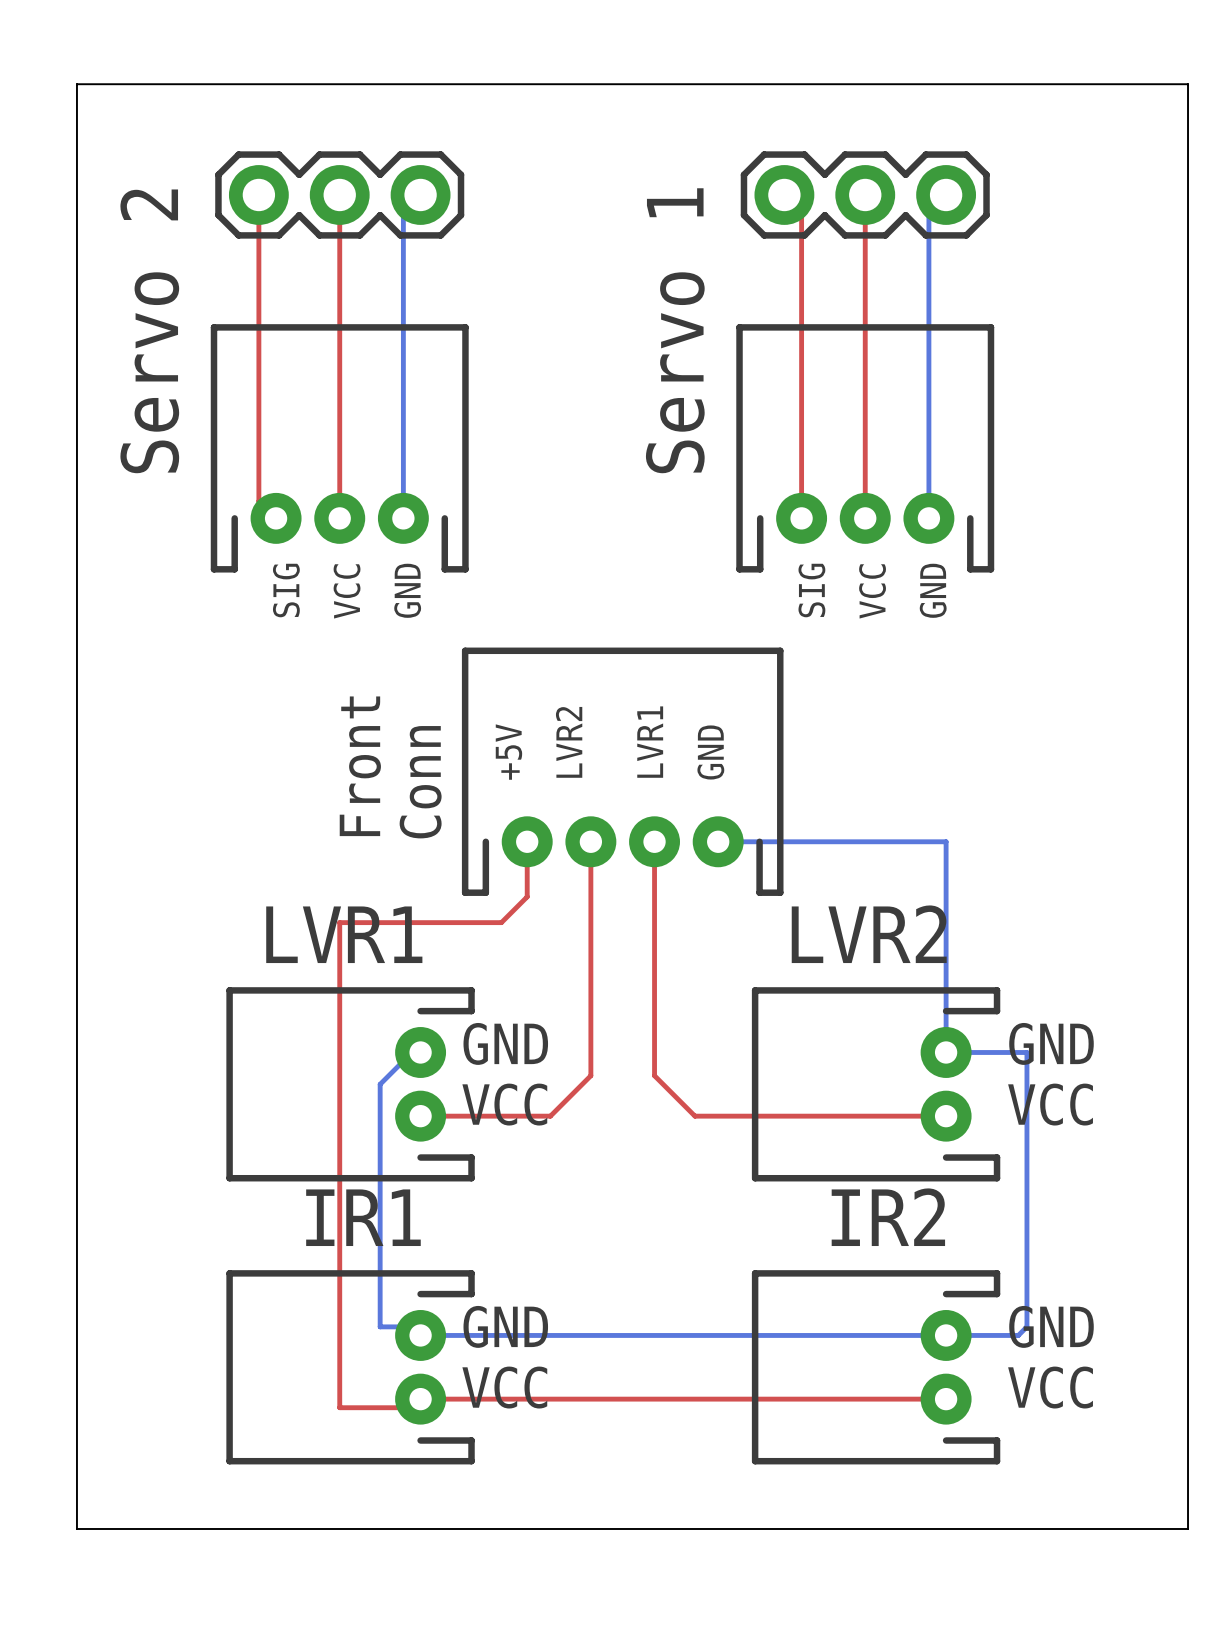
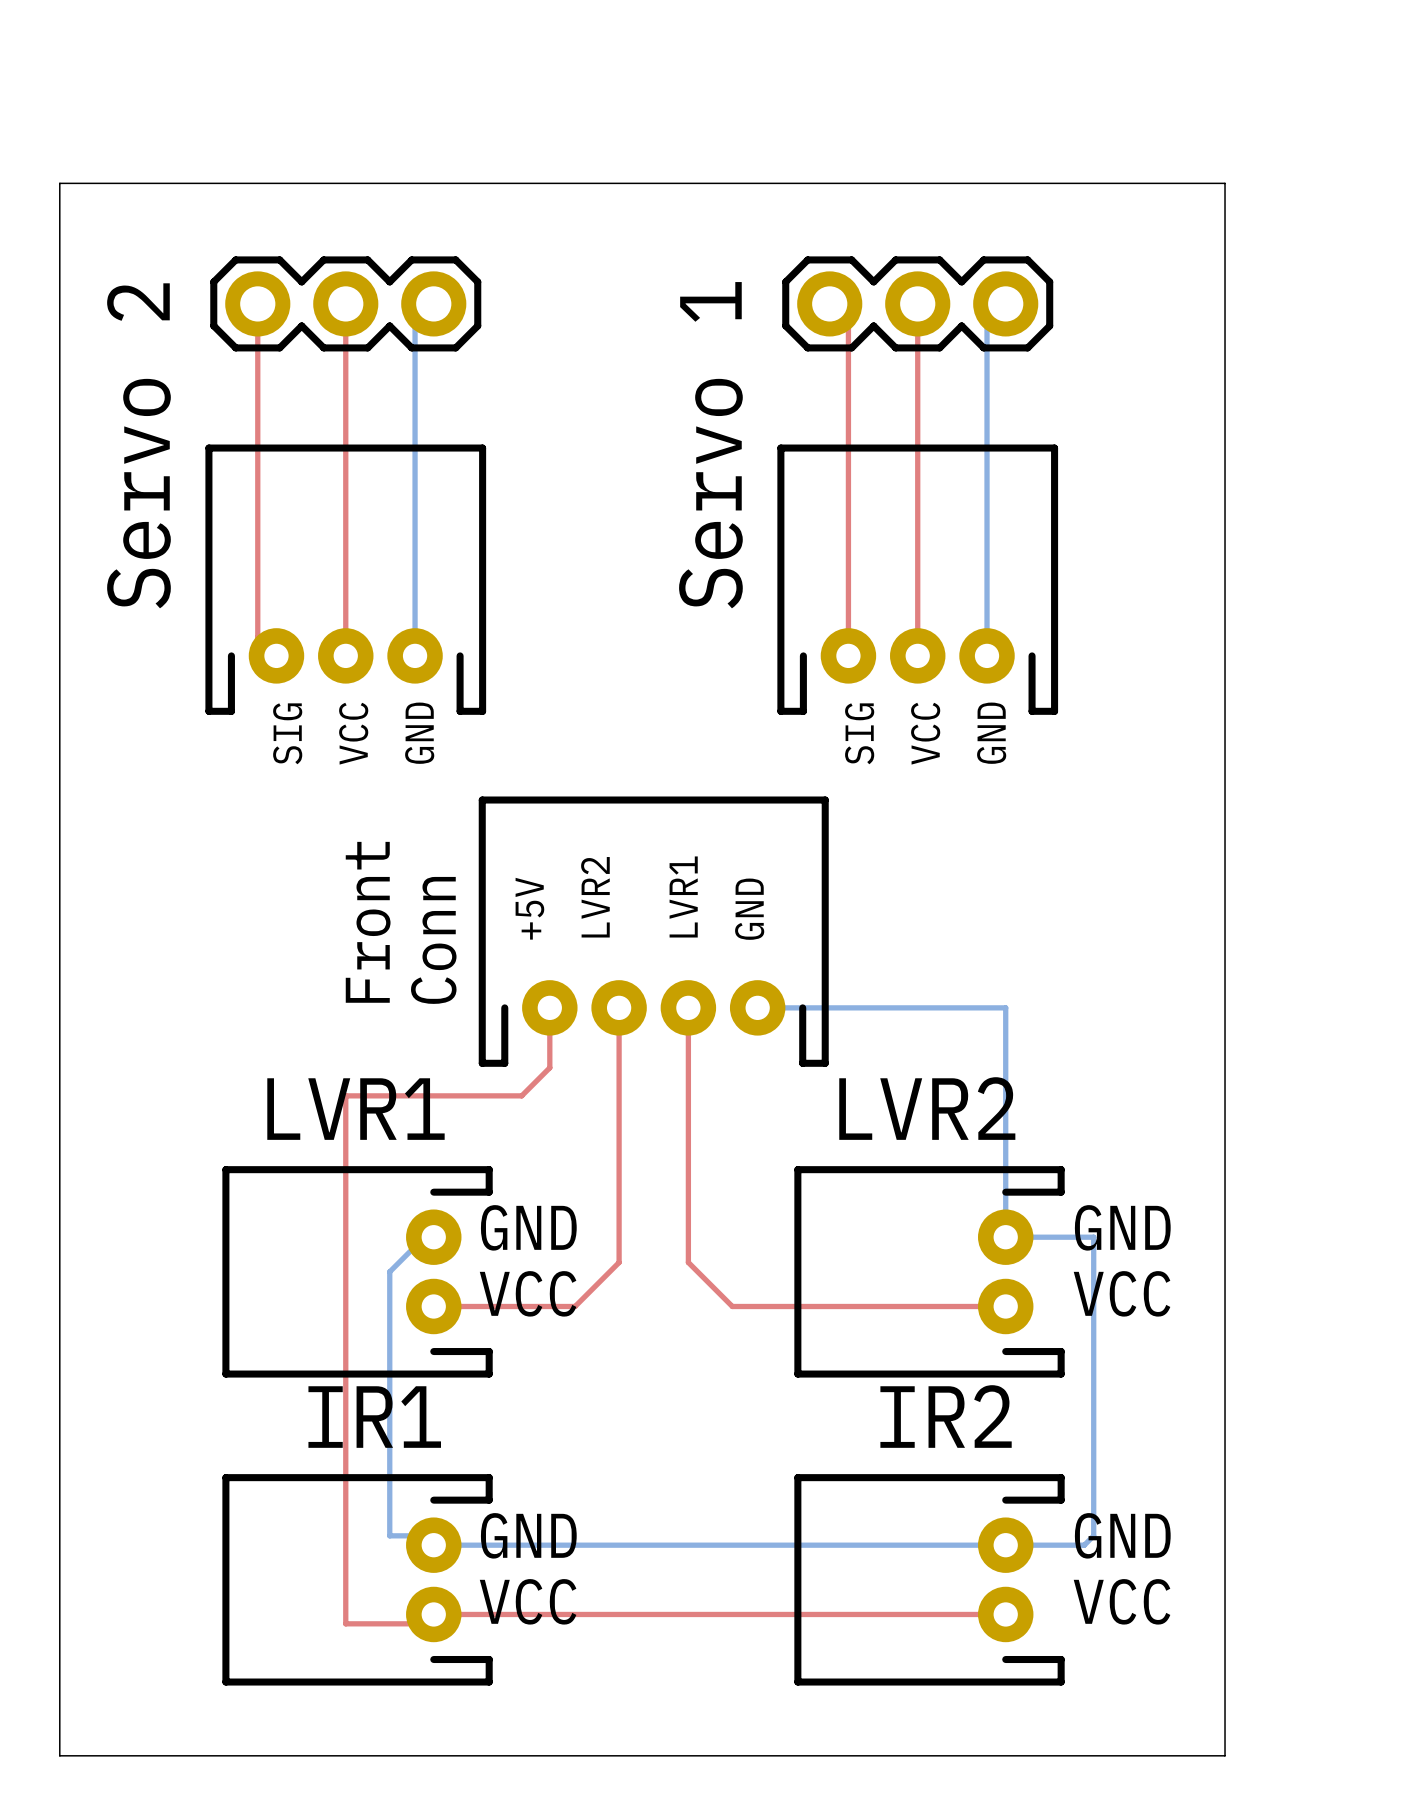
board edge: (1147, 84) (1188, 84) (1188, 1528) (1147, 1528) -> (1225, 183) (1225, 1755)

